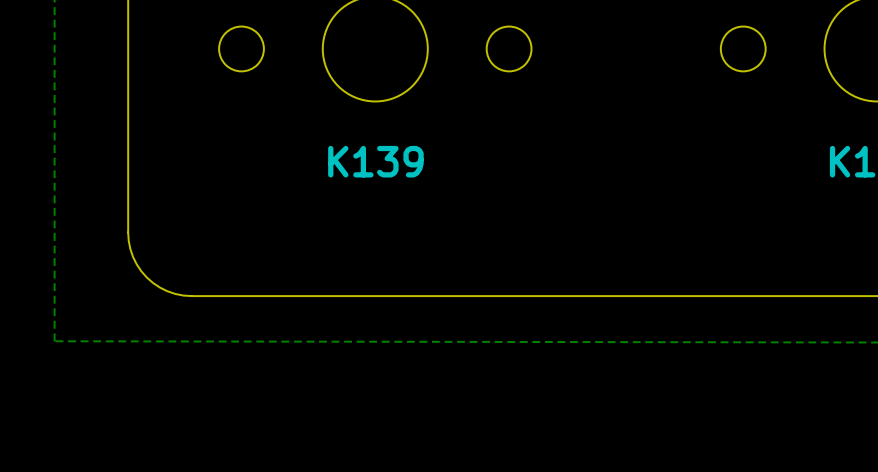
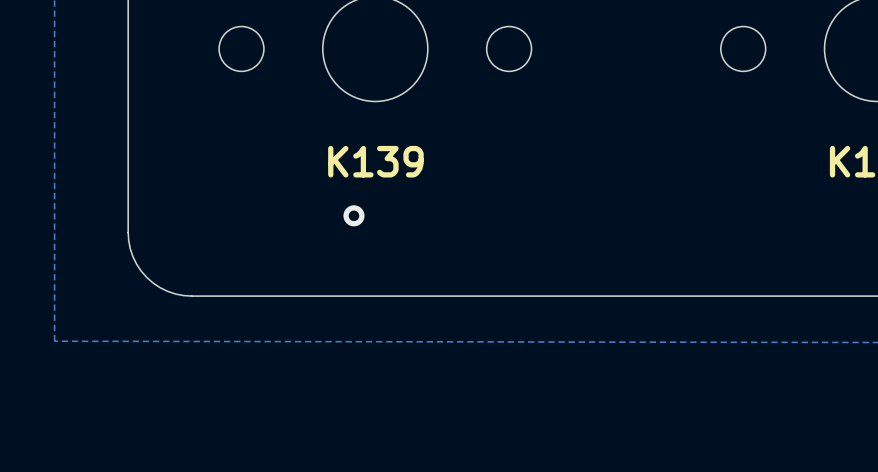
via: none -> (353, 215)

